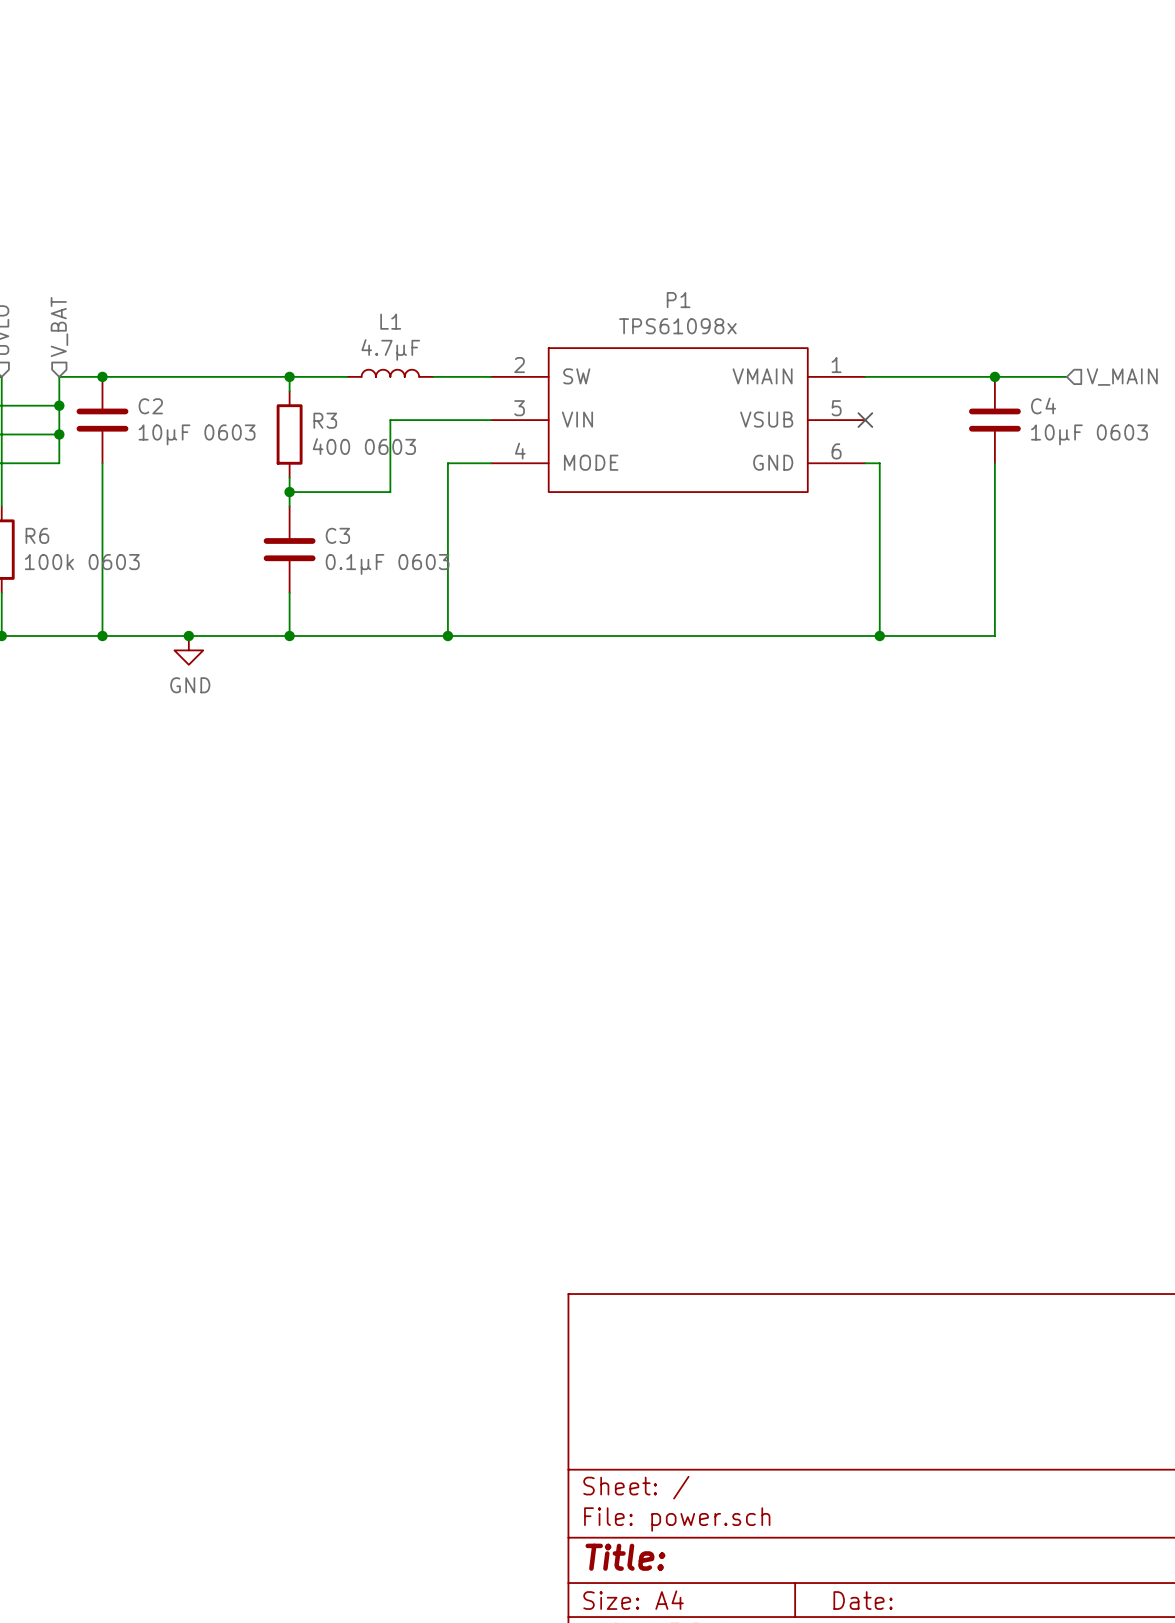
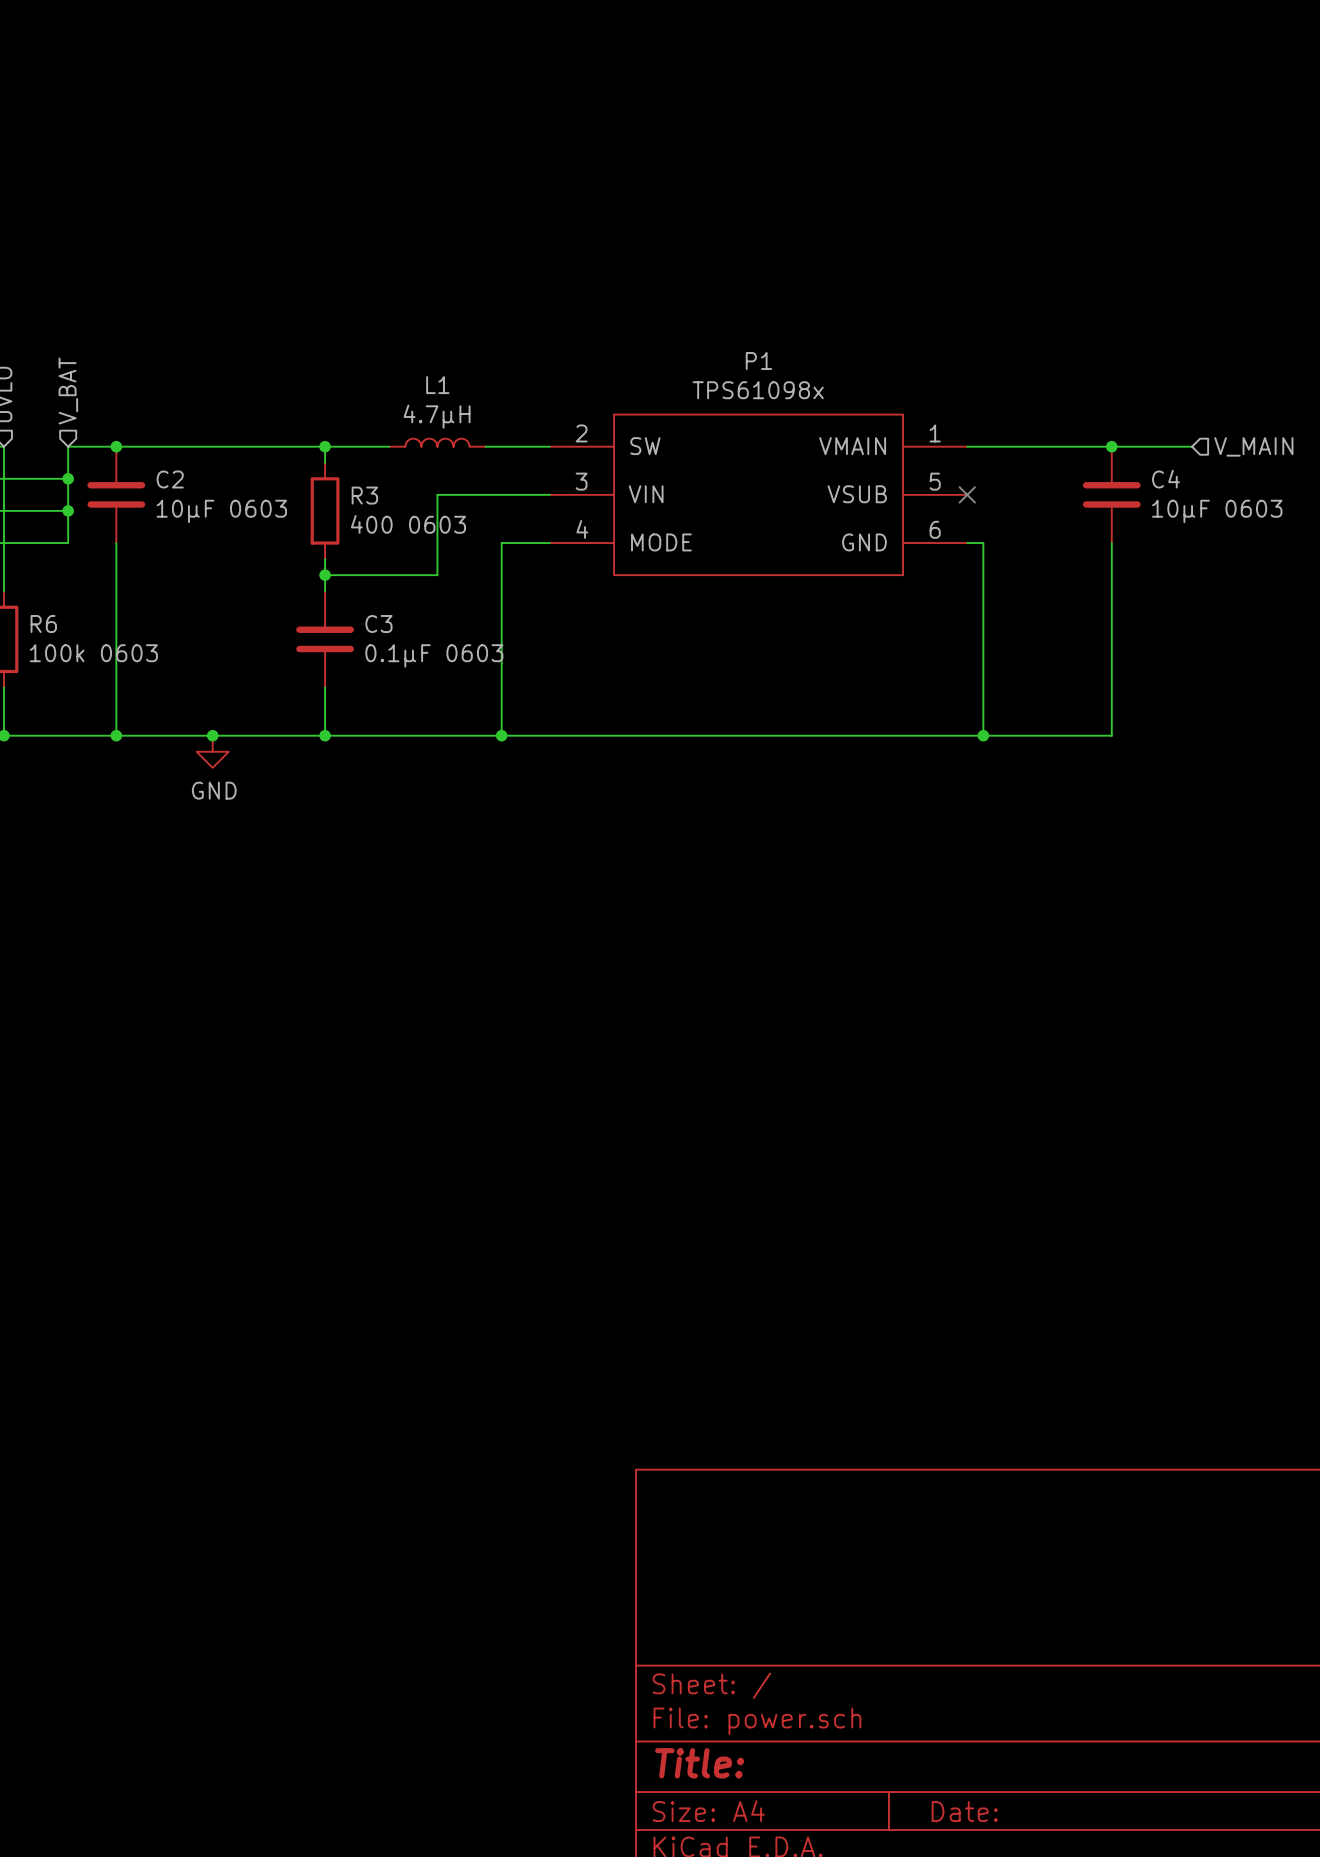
L1 value: 4.7µF (390, 349) -> 4.7µH (437, 416)

